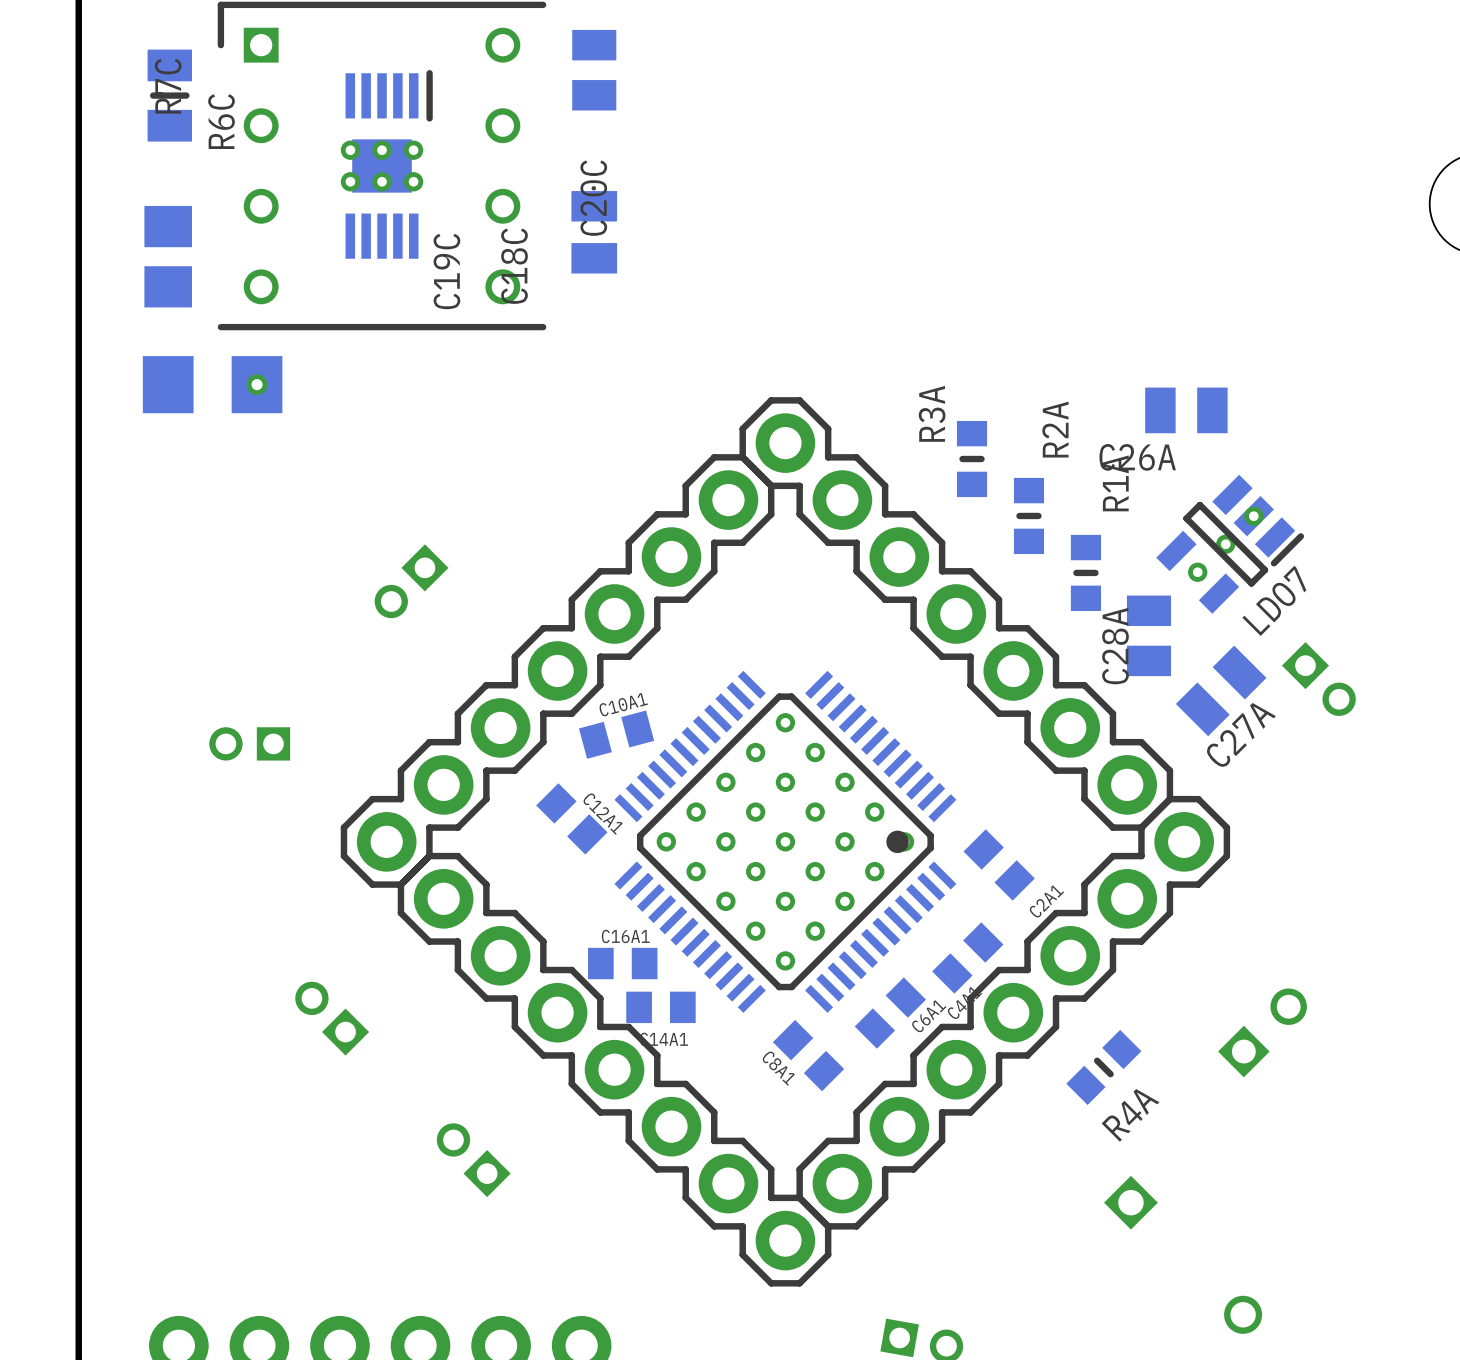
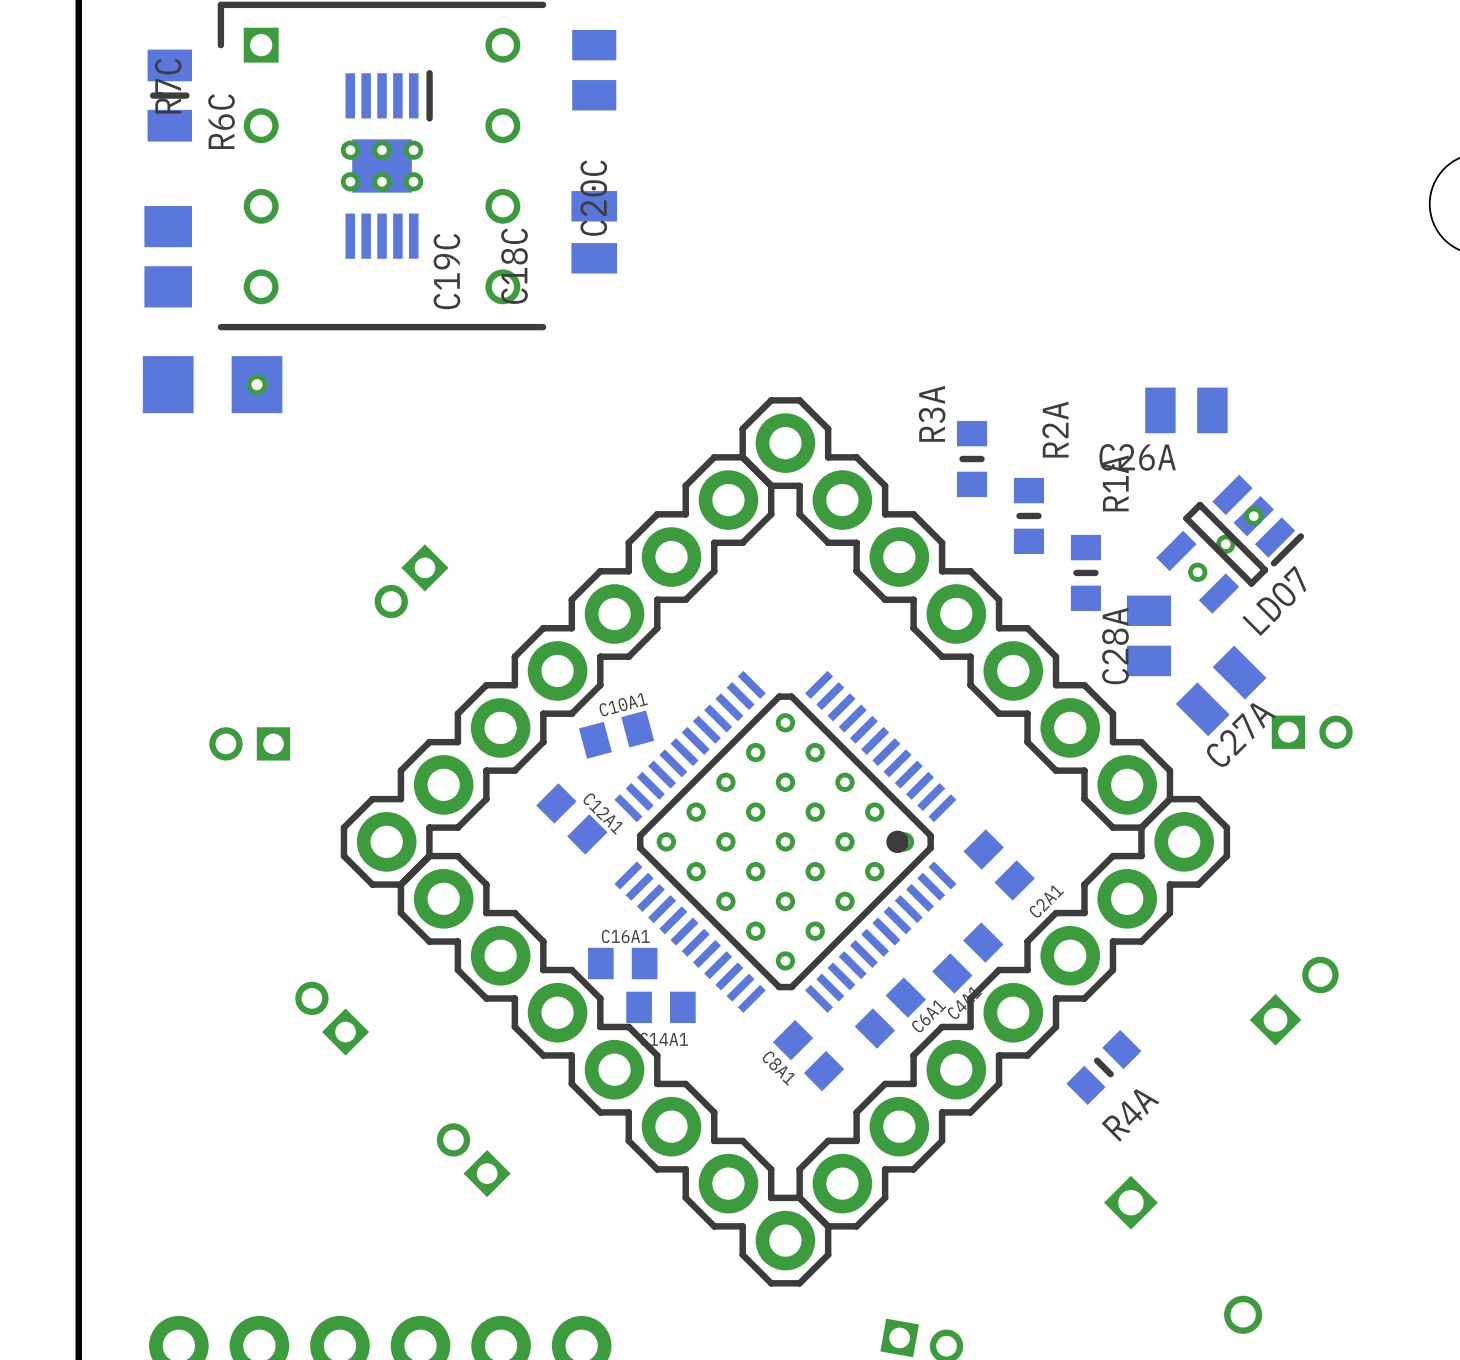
part: (1318, 679) -> none
part: none -> (1312, 732)
part position: (1262, 1032) -> (1294, 1001)

